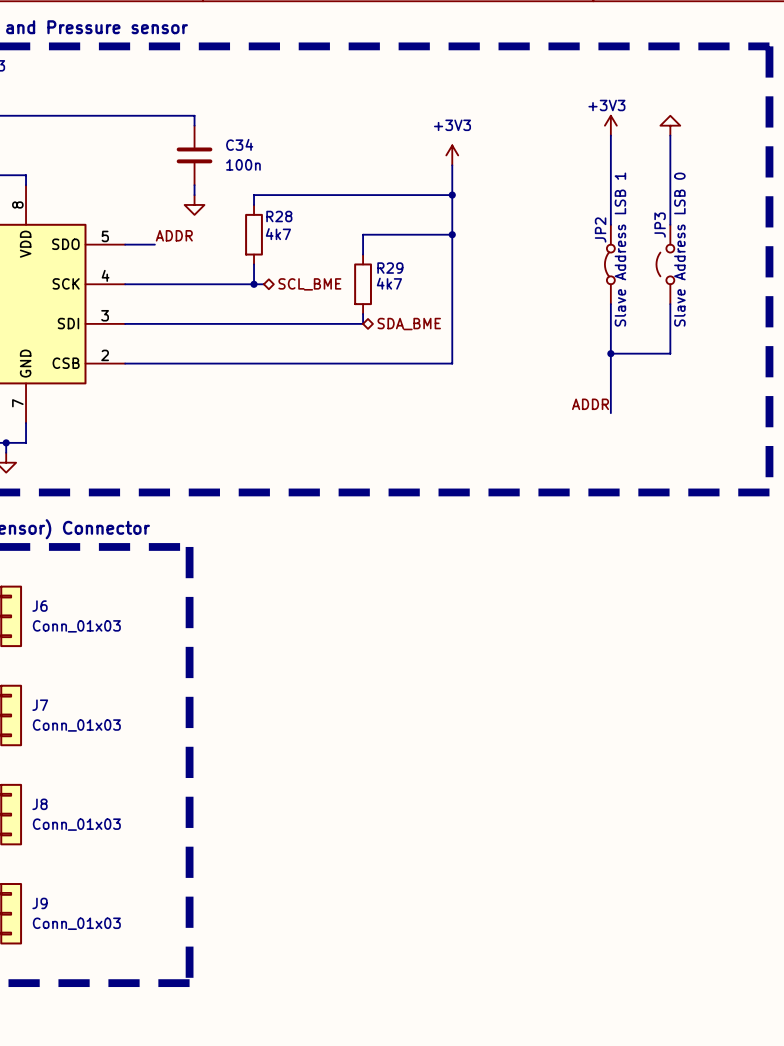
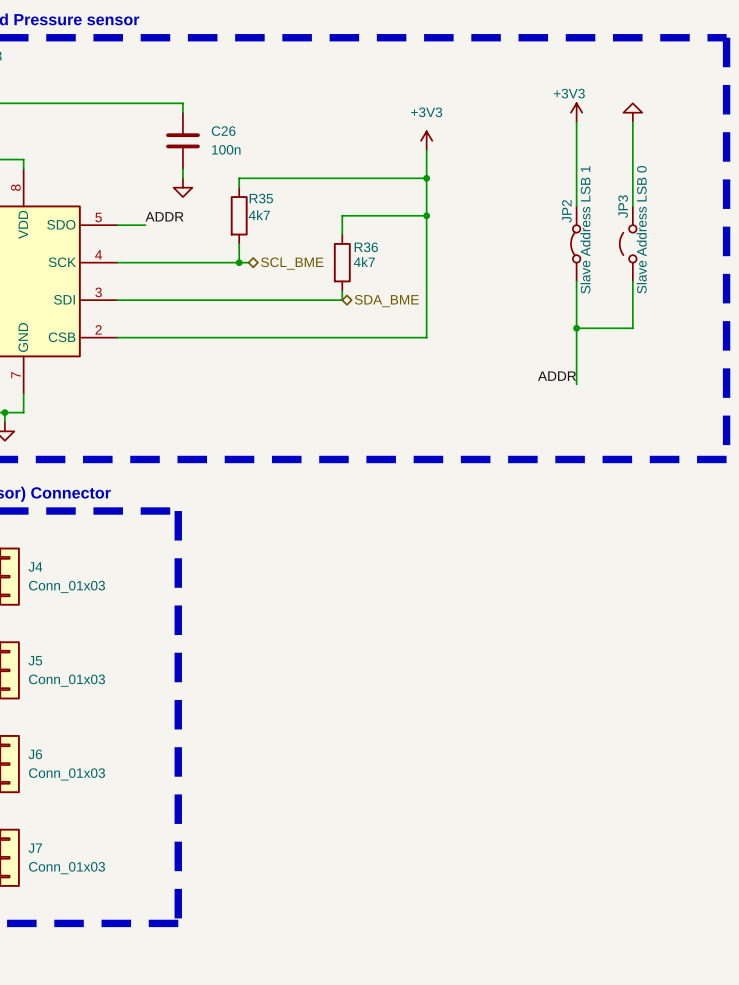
C34 name: C34 (239, 144) -> C26 (223, 131)
R28 name: R28 (279, 216) -> R35 (261, 198)
R29 name: R29 (390, 268) -> R36 (366, 247)
J6 name: J6 (40, 606) -> J4 (35, 566)
J7 name: J7 (40, 705) -> J5 (35, 660)
J8 name: J8 (40, 804) -> J6 (35, 754)
J9 name: J9 (40, 903) -> J7 (35, 848)

